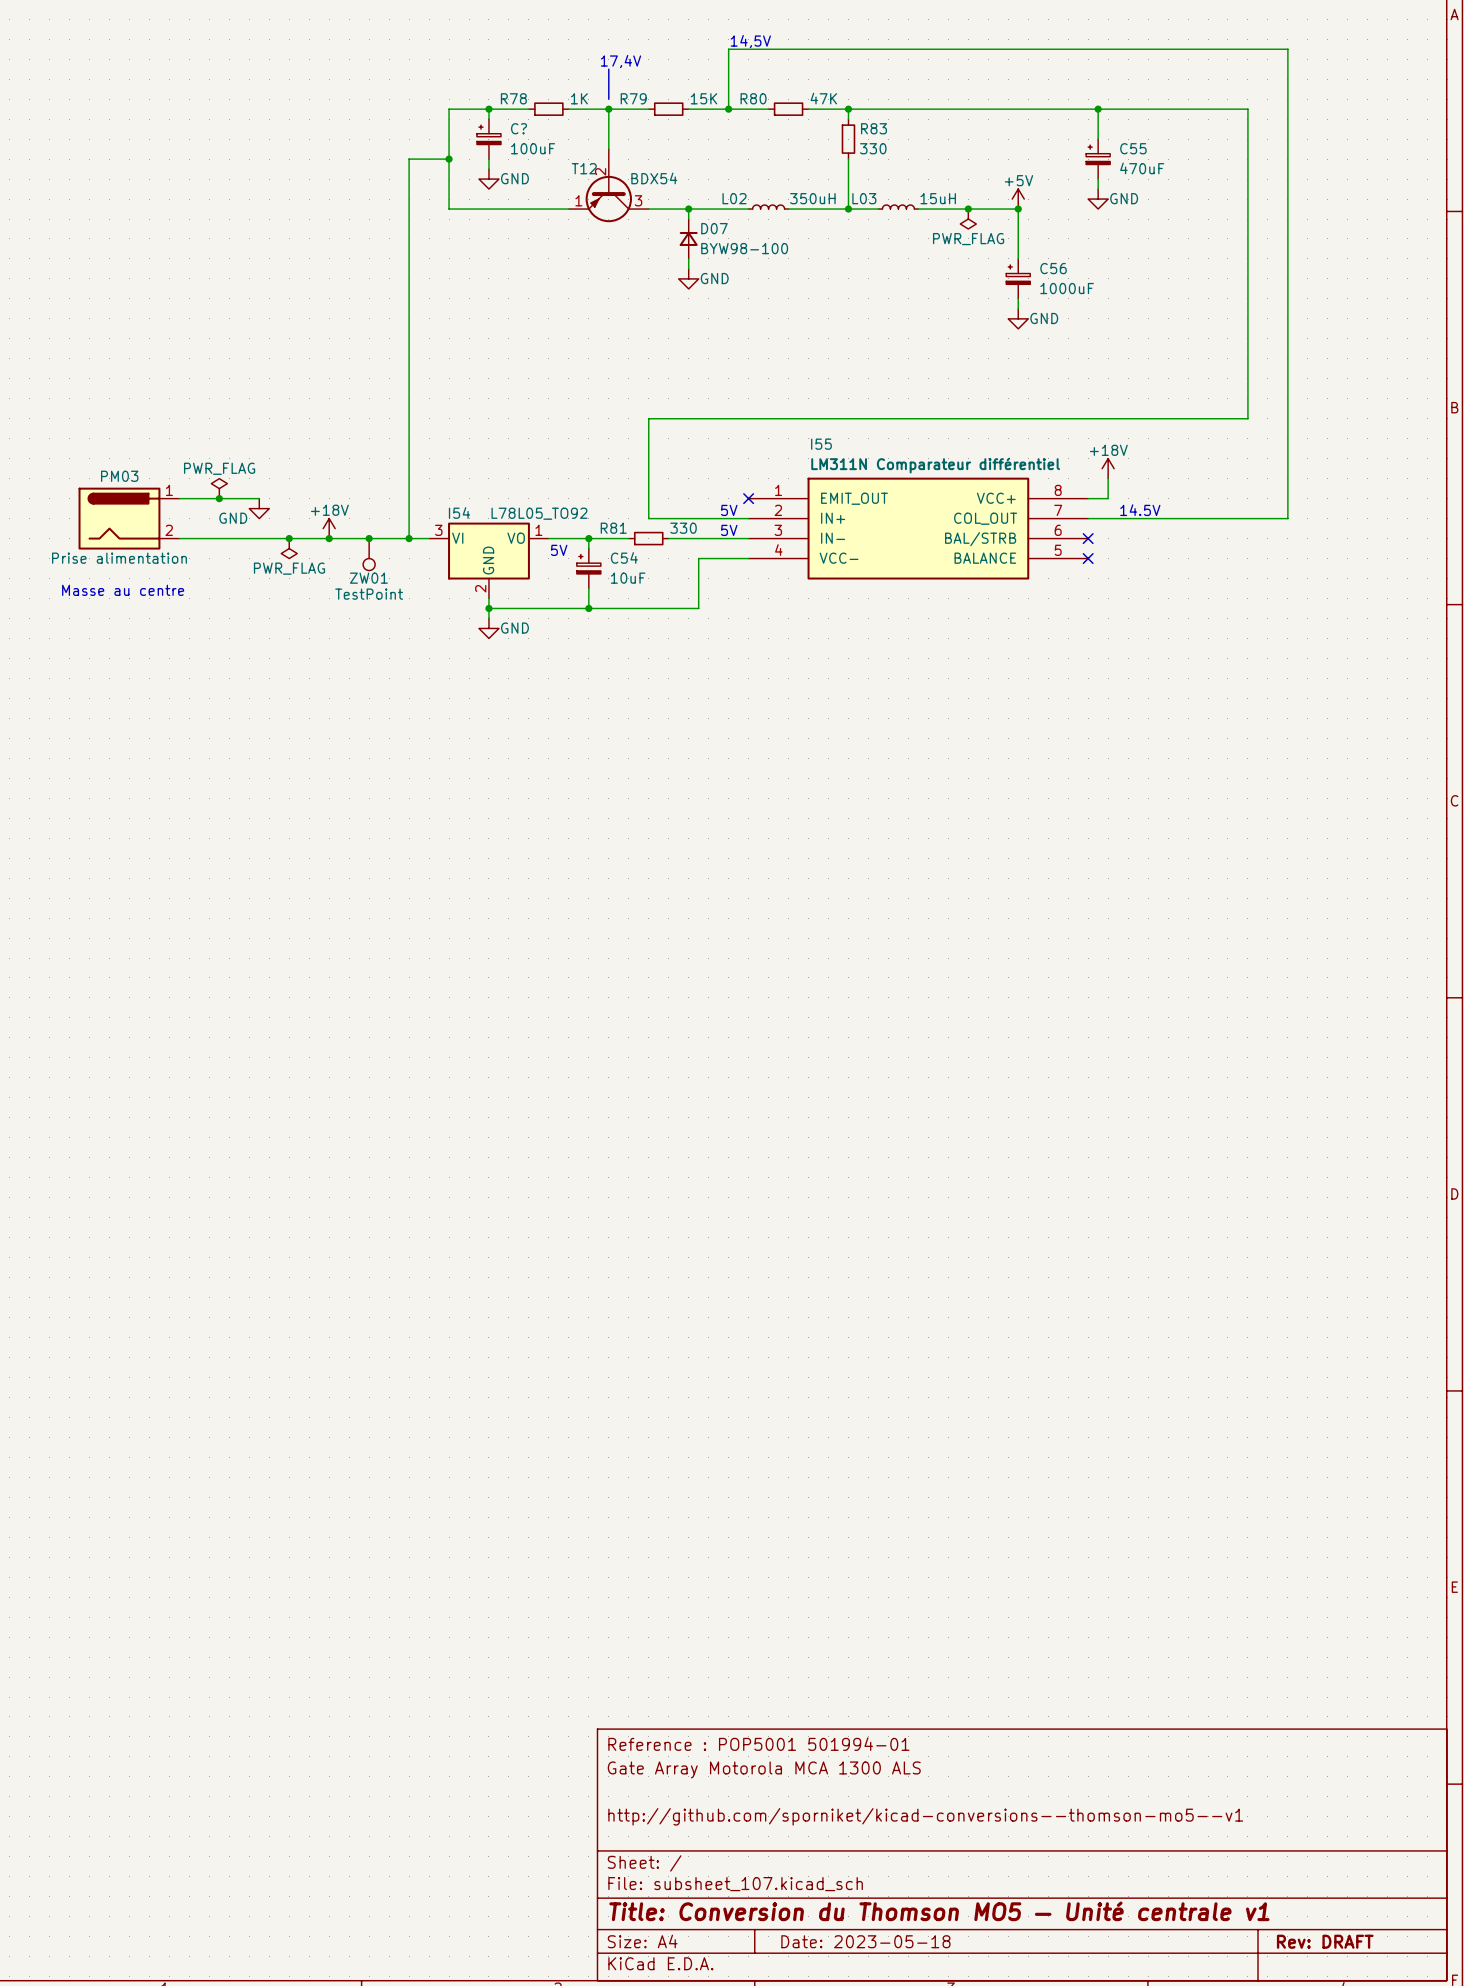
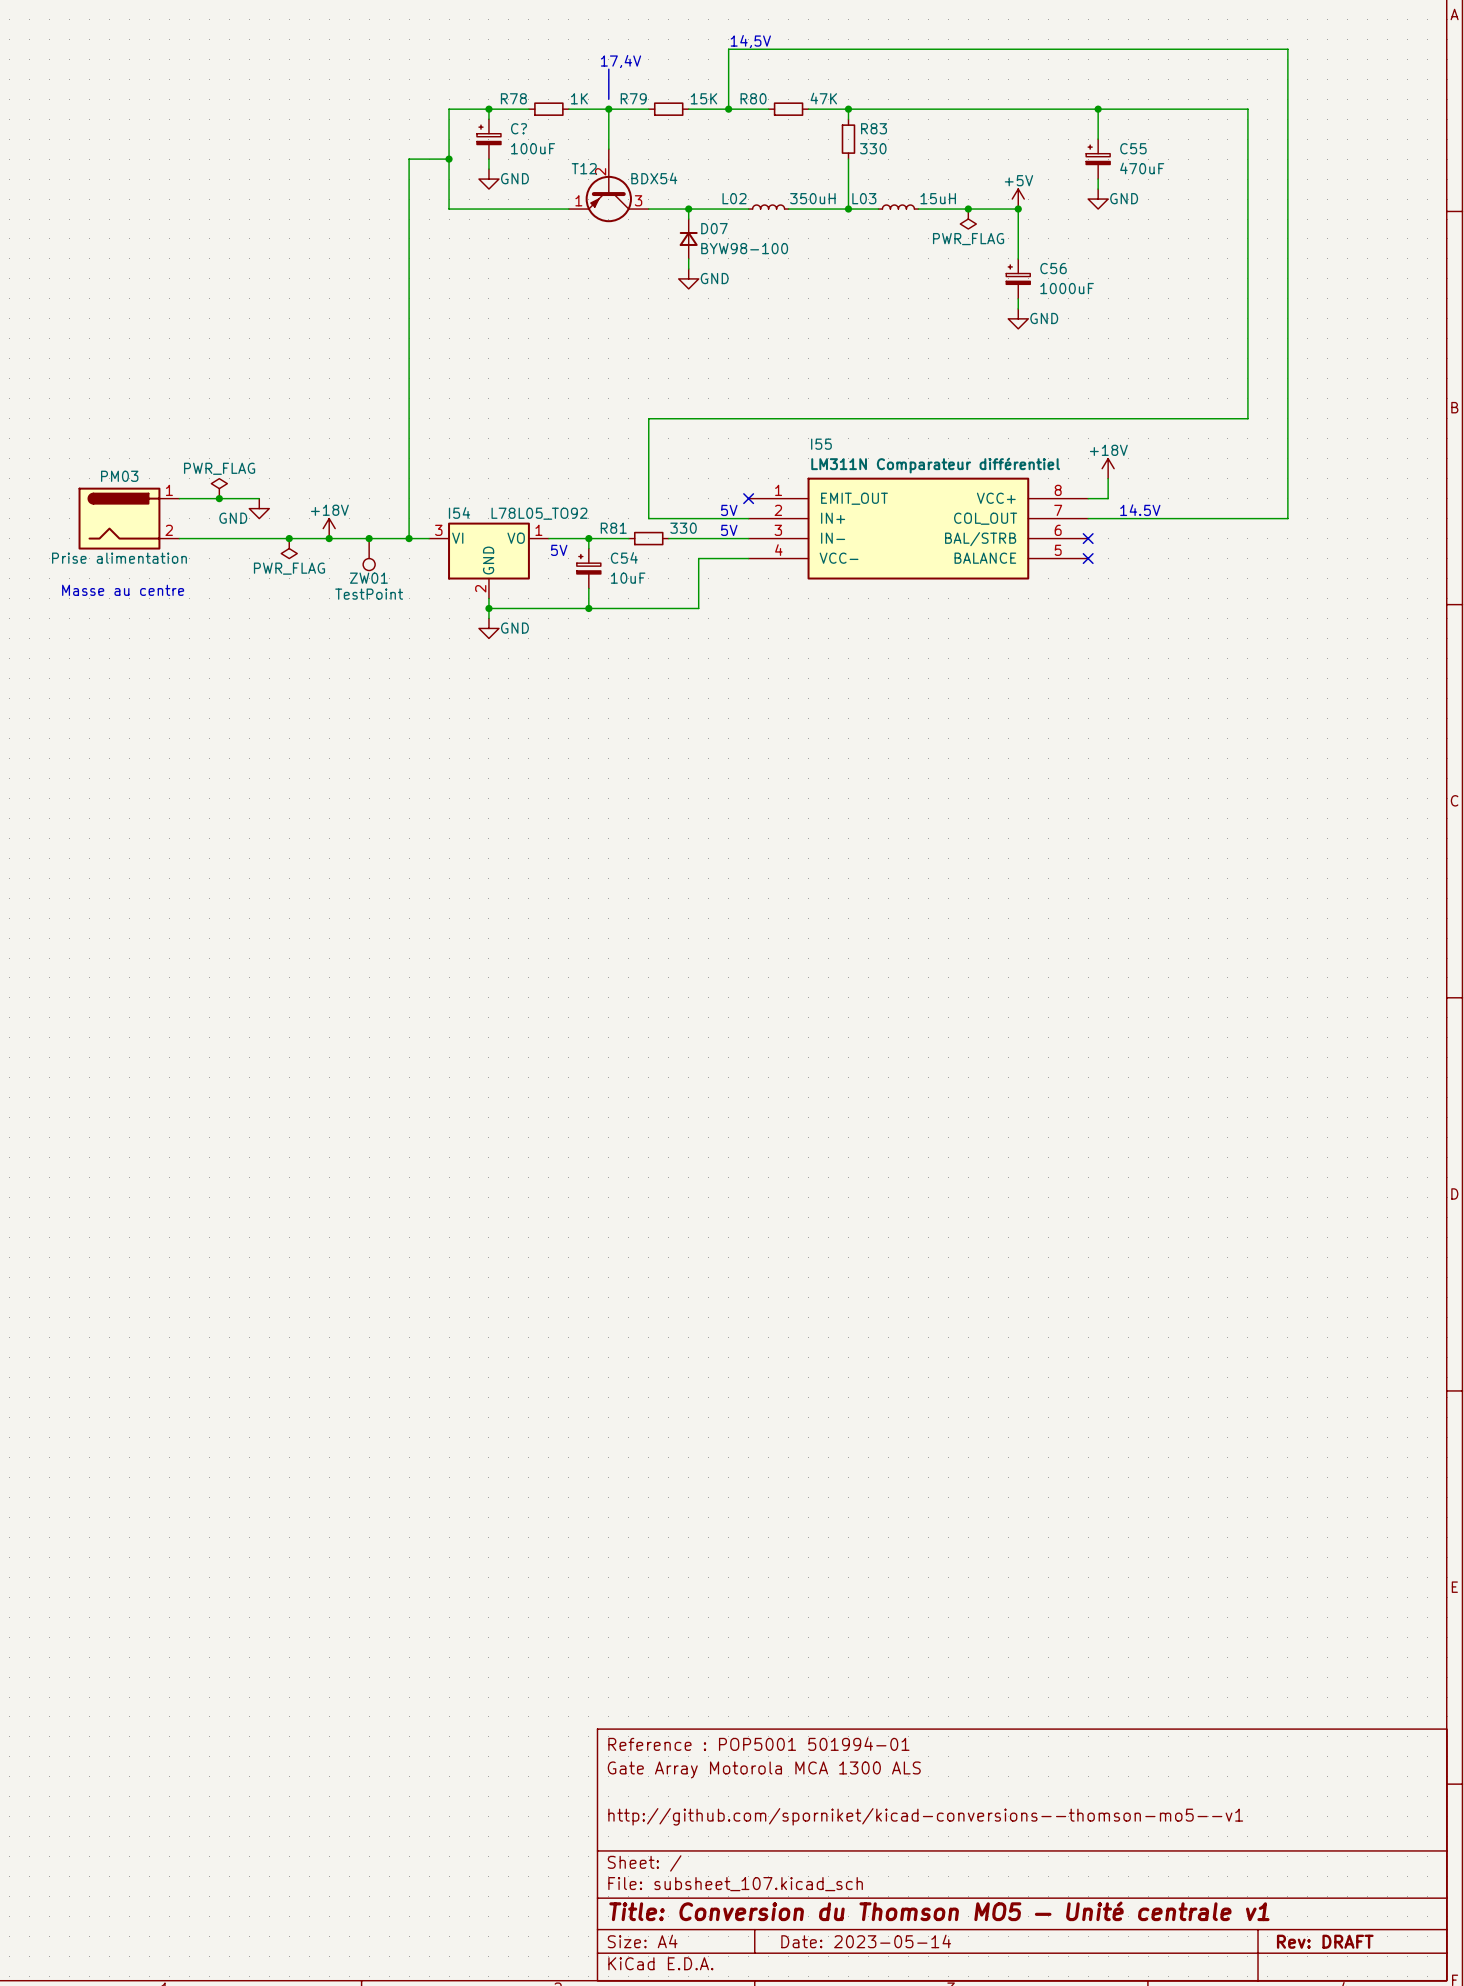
title block: Date: 2023-05-18 (865, 1941) -> Date: 2023-05-14 (866, 1941)

